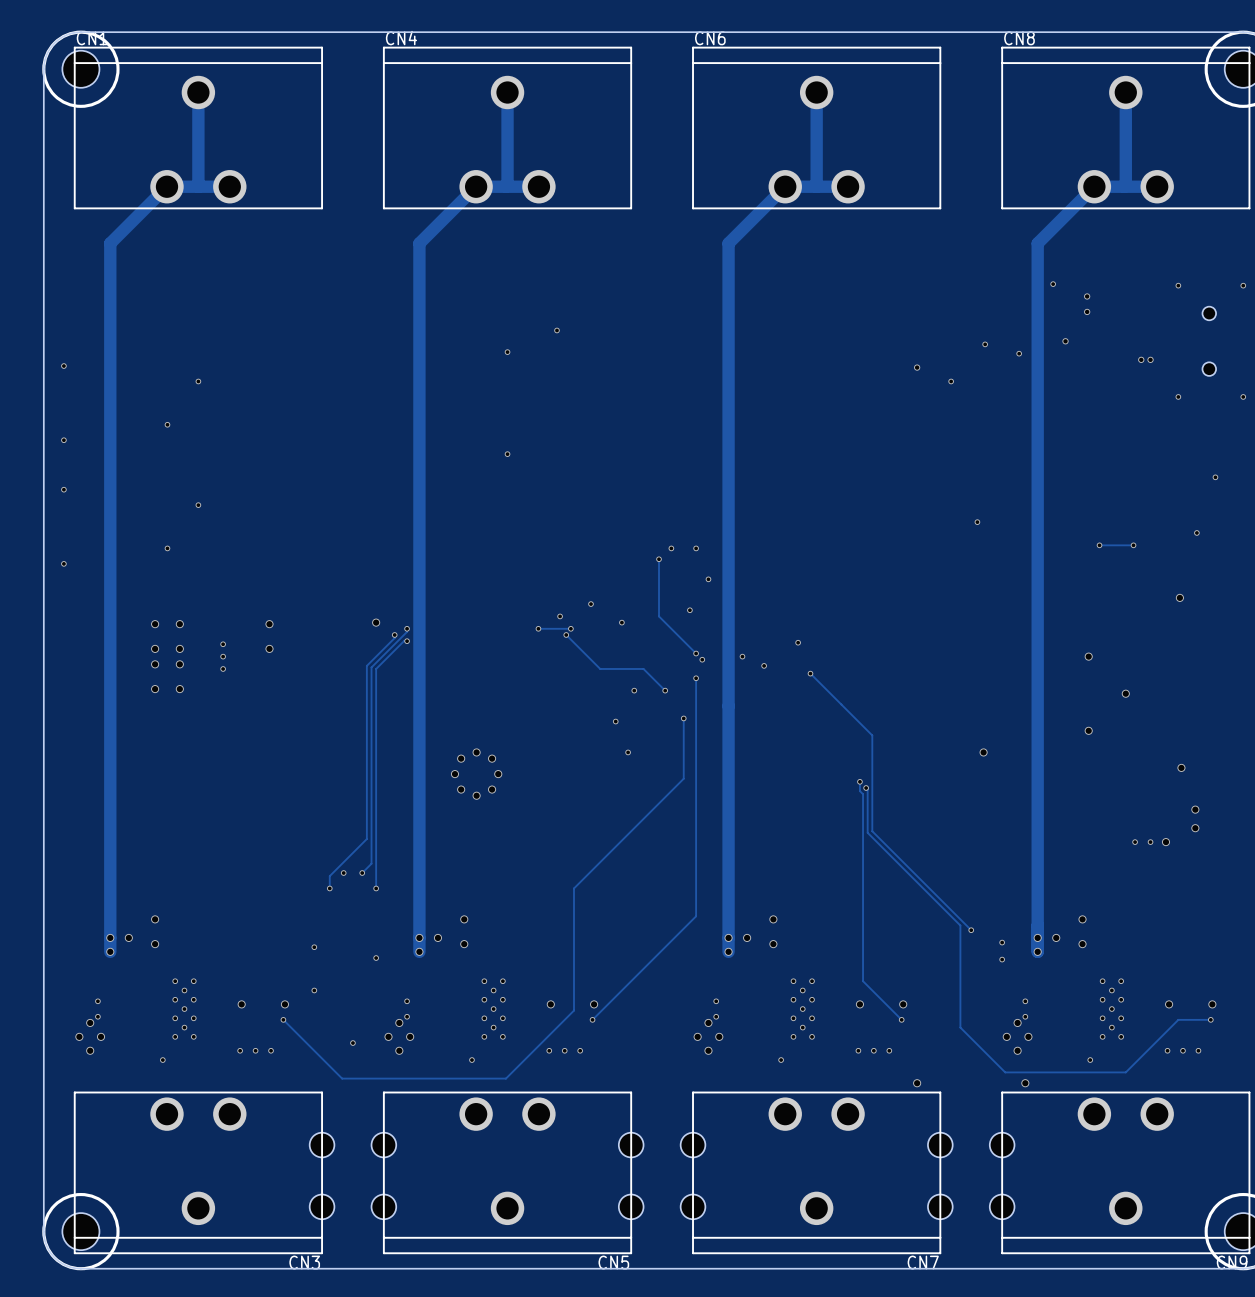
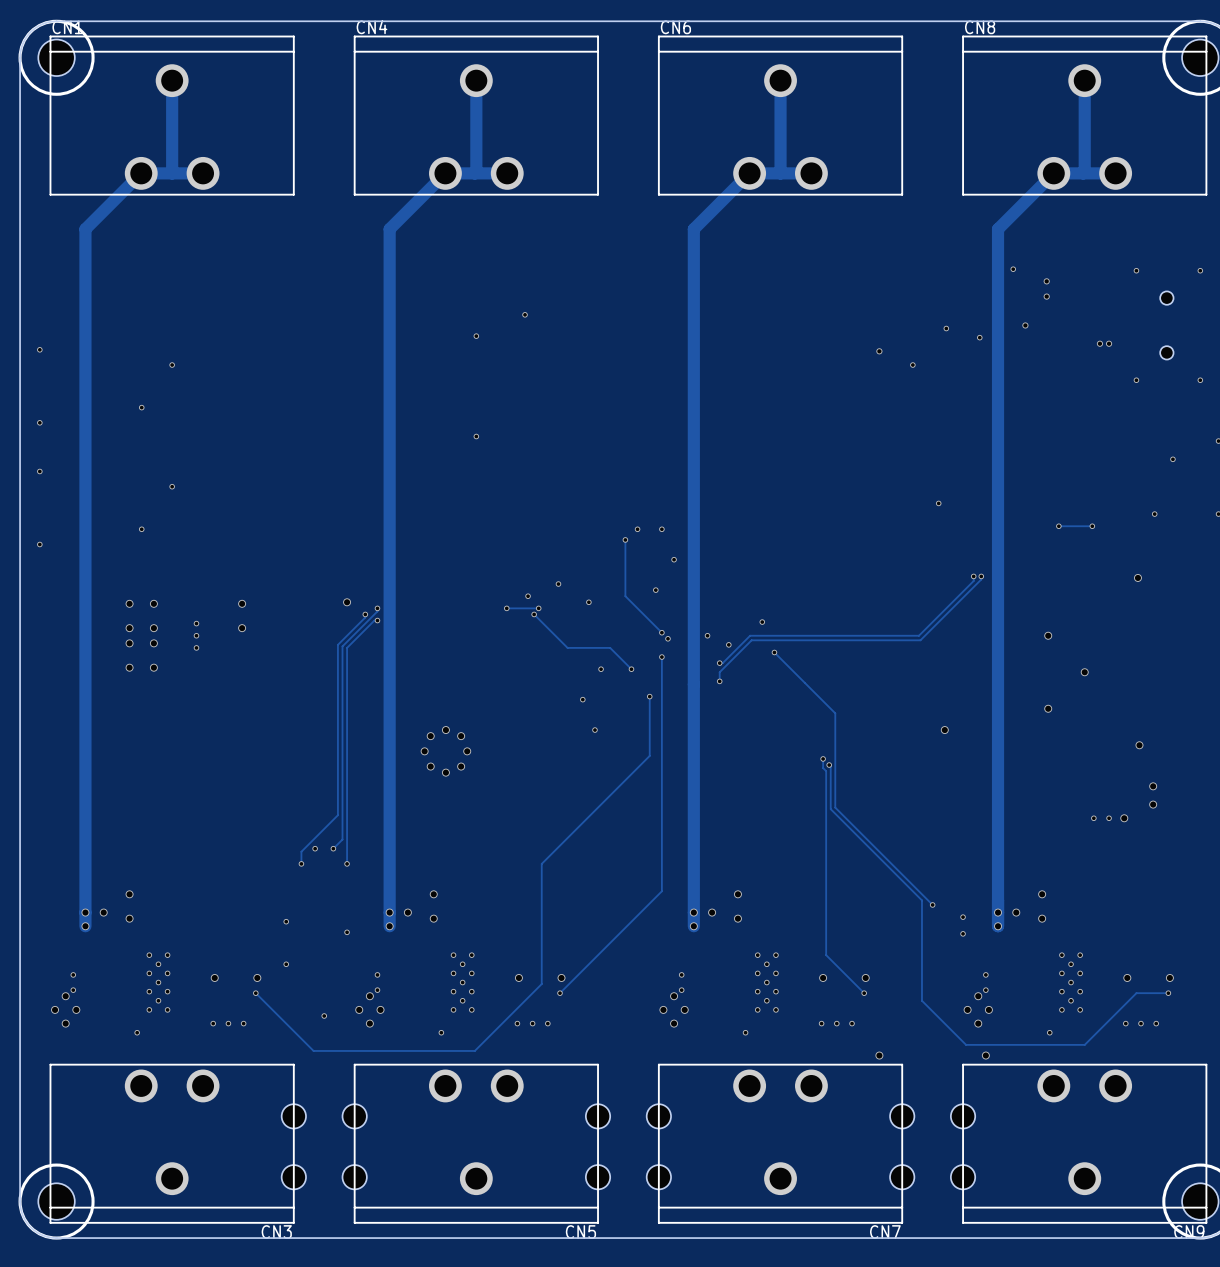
track: none -> (973, 576) (973, 581) (918, 635) (750, 635) (722, 663) (719, 663)
via: none -> (973, 576)
track: none -> (981, 576) (981, 579) (920, 640) (751, 640) (719, 672) (719, 681)
via: none -> (981, 576)
via: none -> (719, 663)
via: none -> (719, 681)

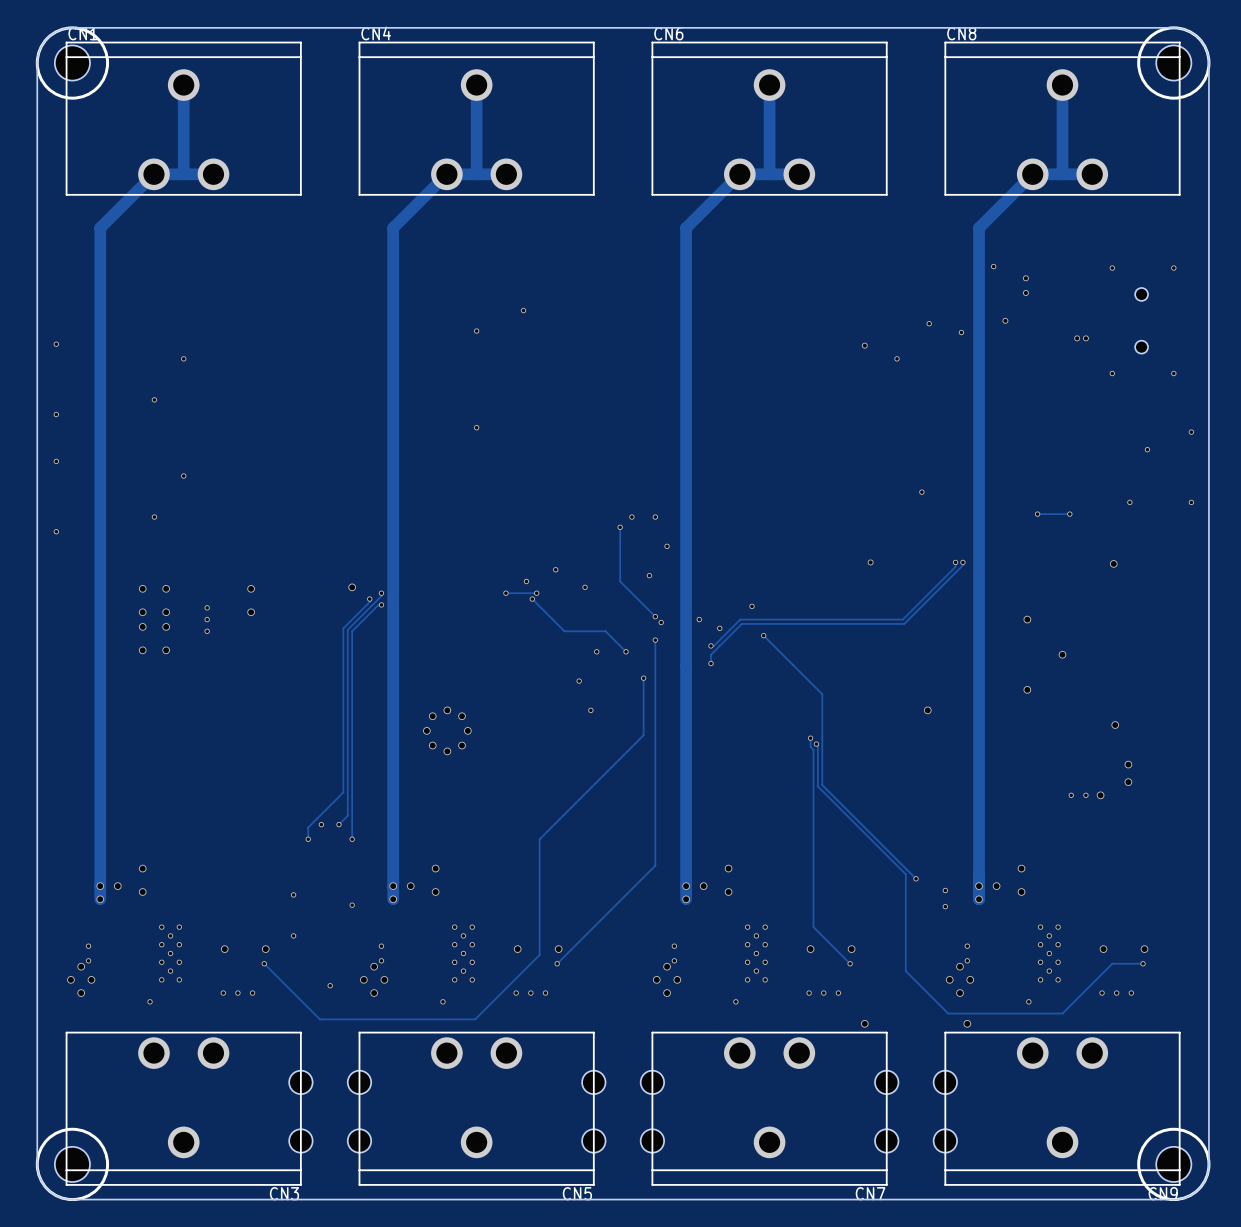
via: none -> (870, 562)

